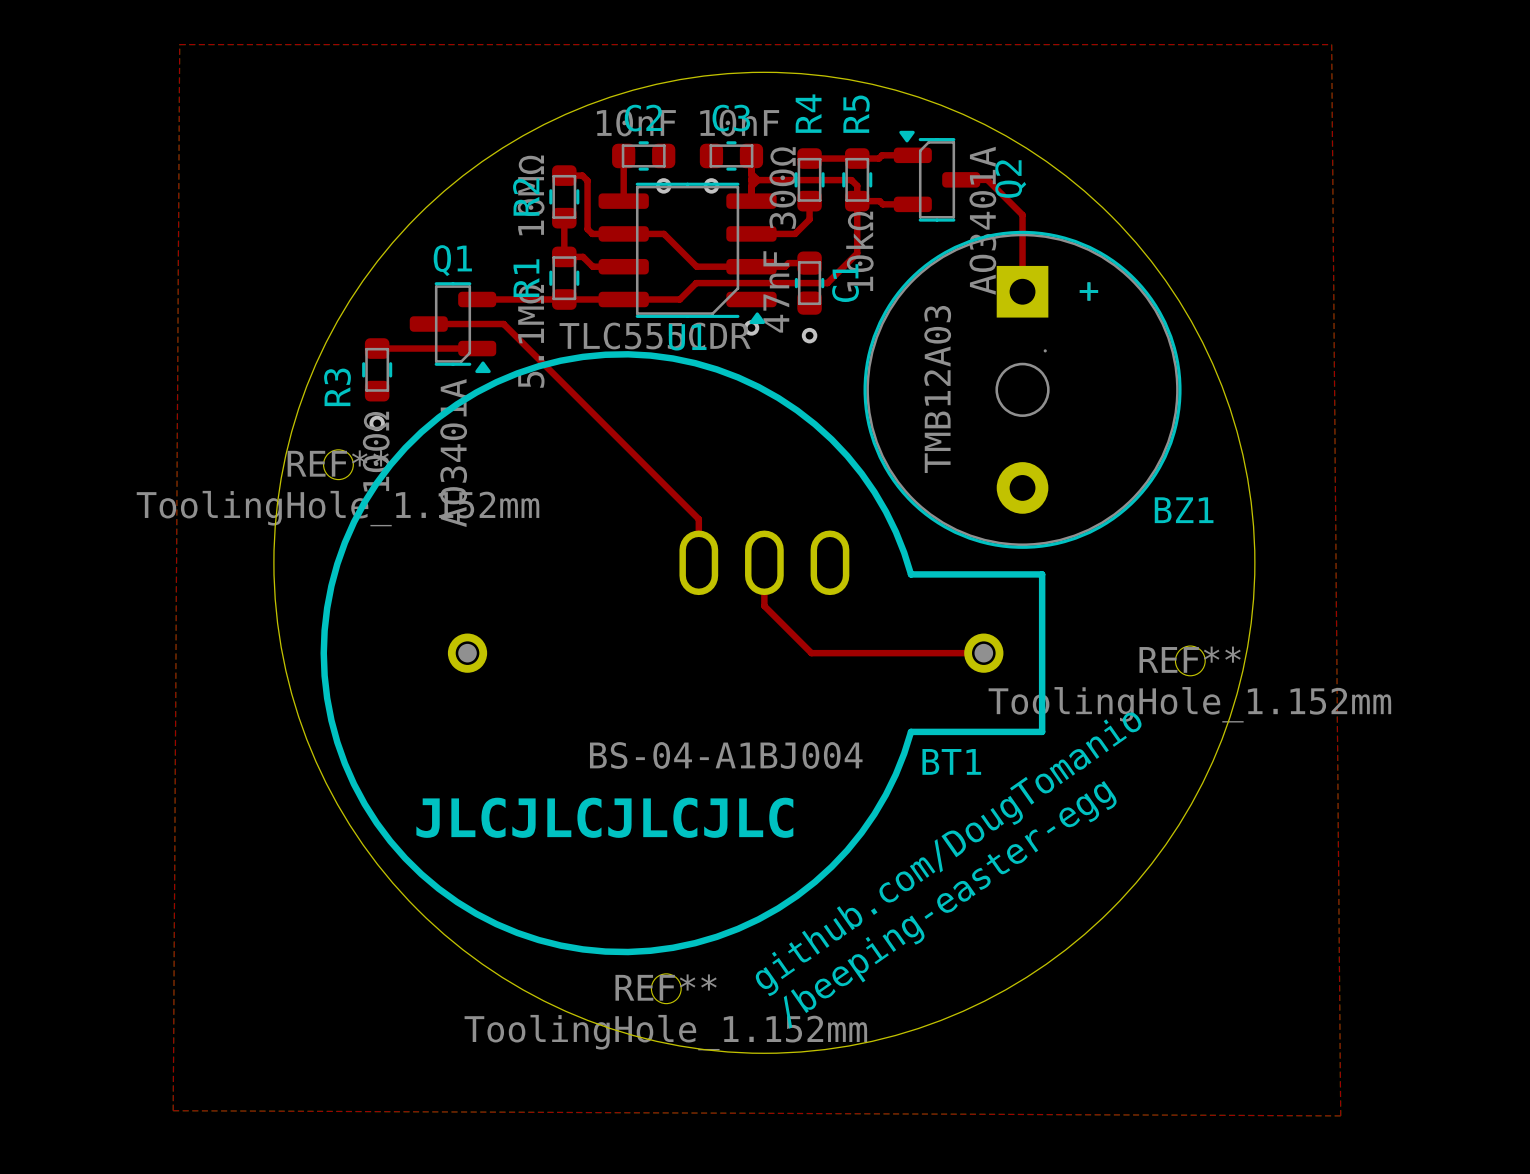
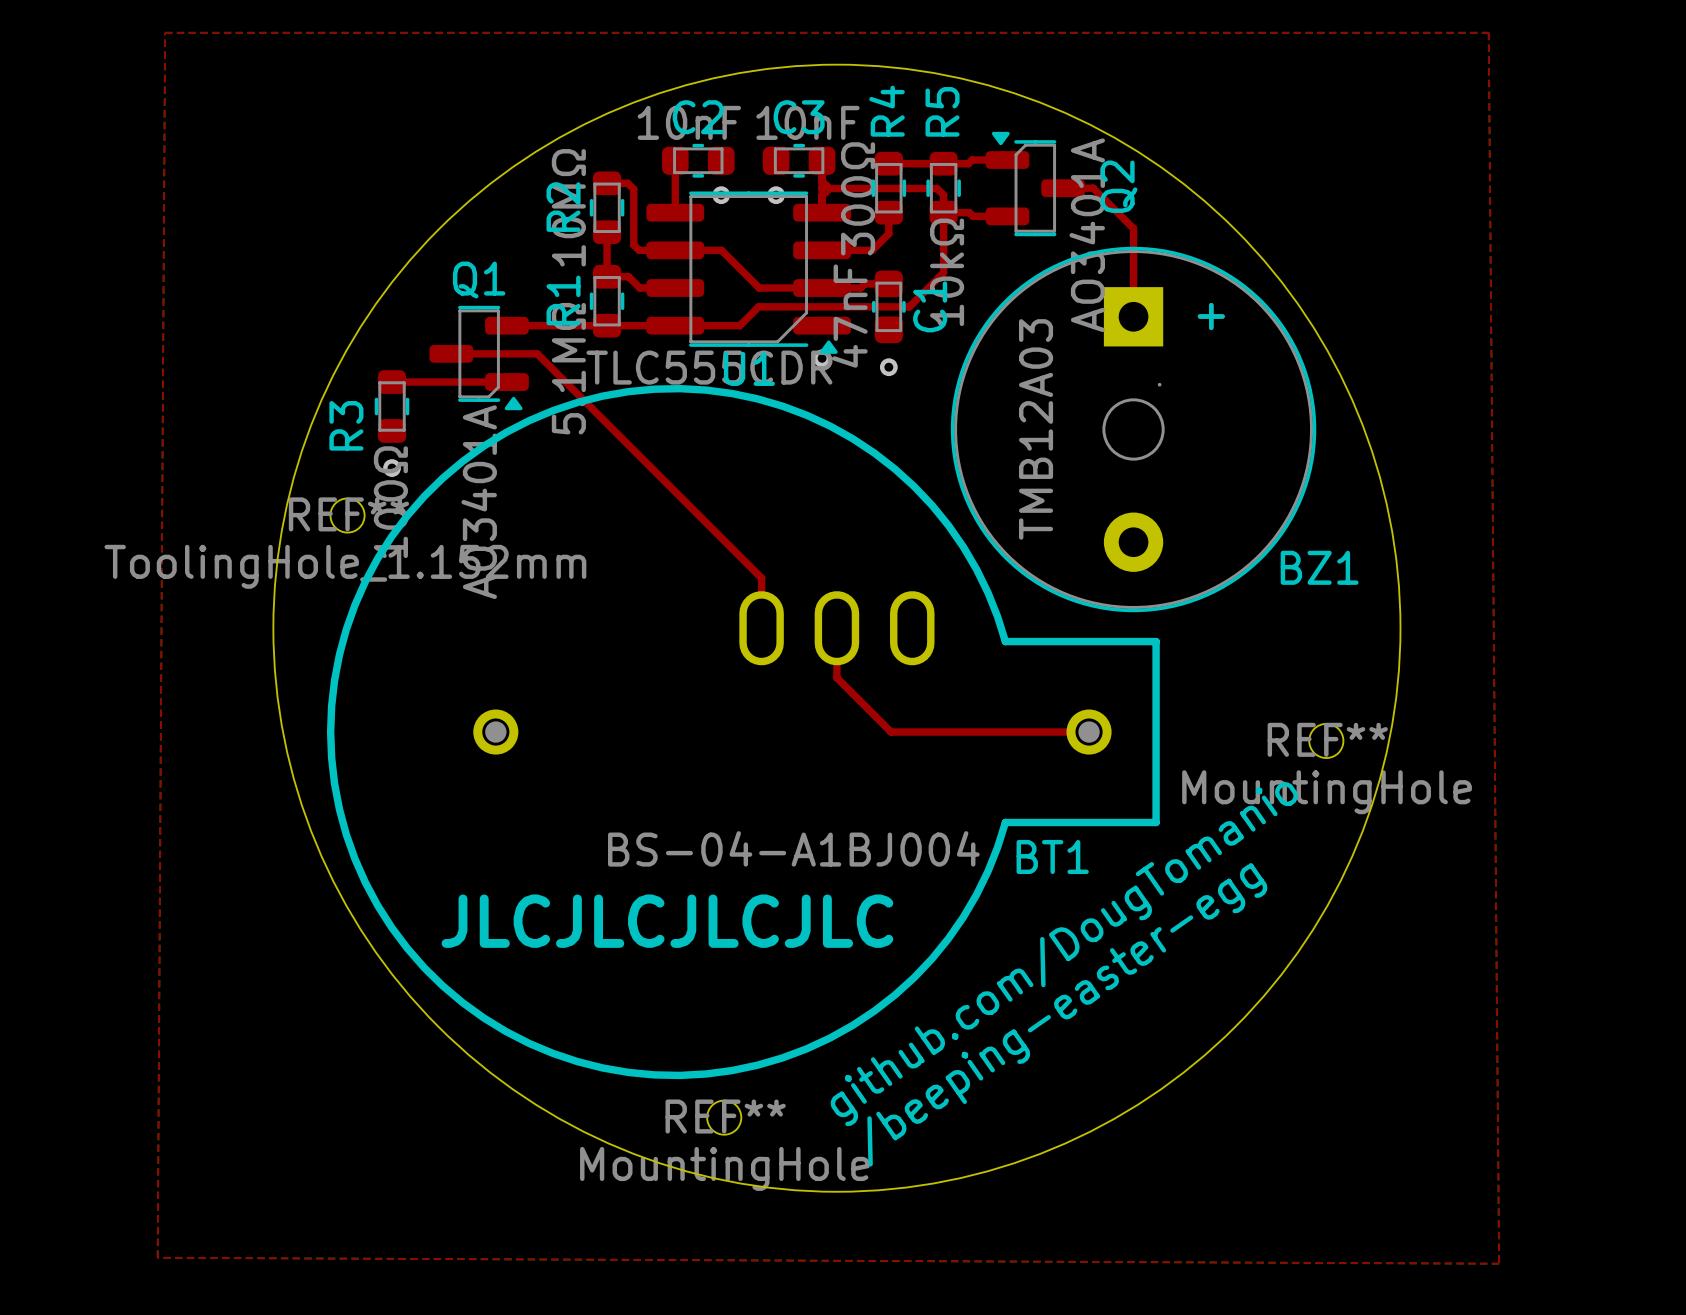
REF** value: ToolingHole_1.152mm (1189, 704) -> MountingHole (1327, 792)
REF** value: ToolingHole_1.152mm (665, 1032) -> MountingHole (724, 1168)

